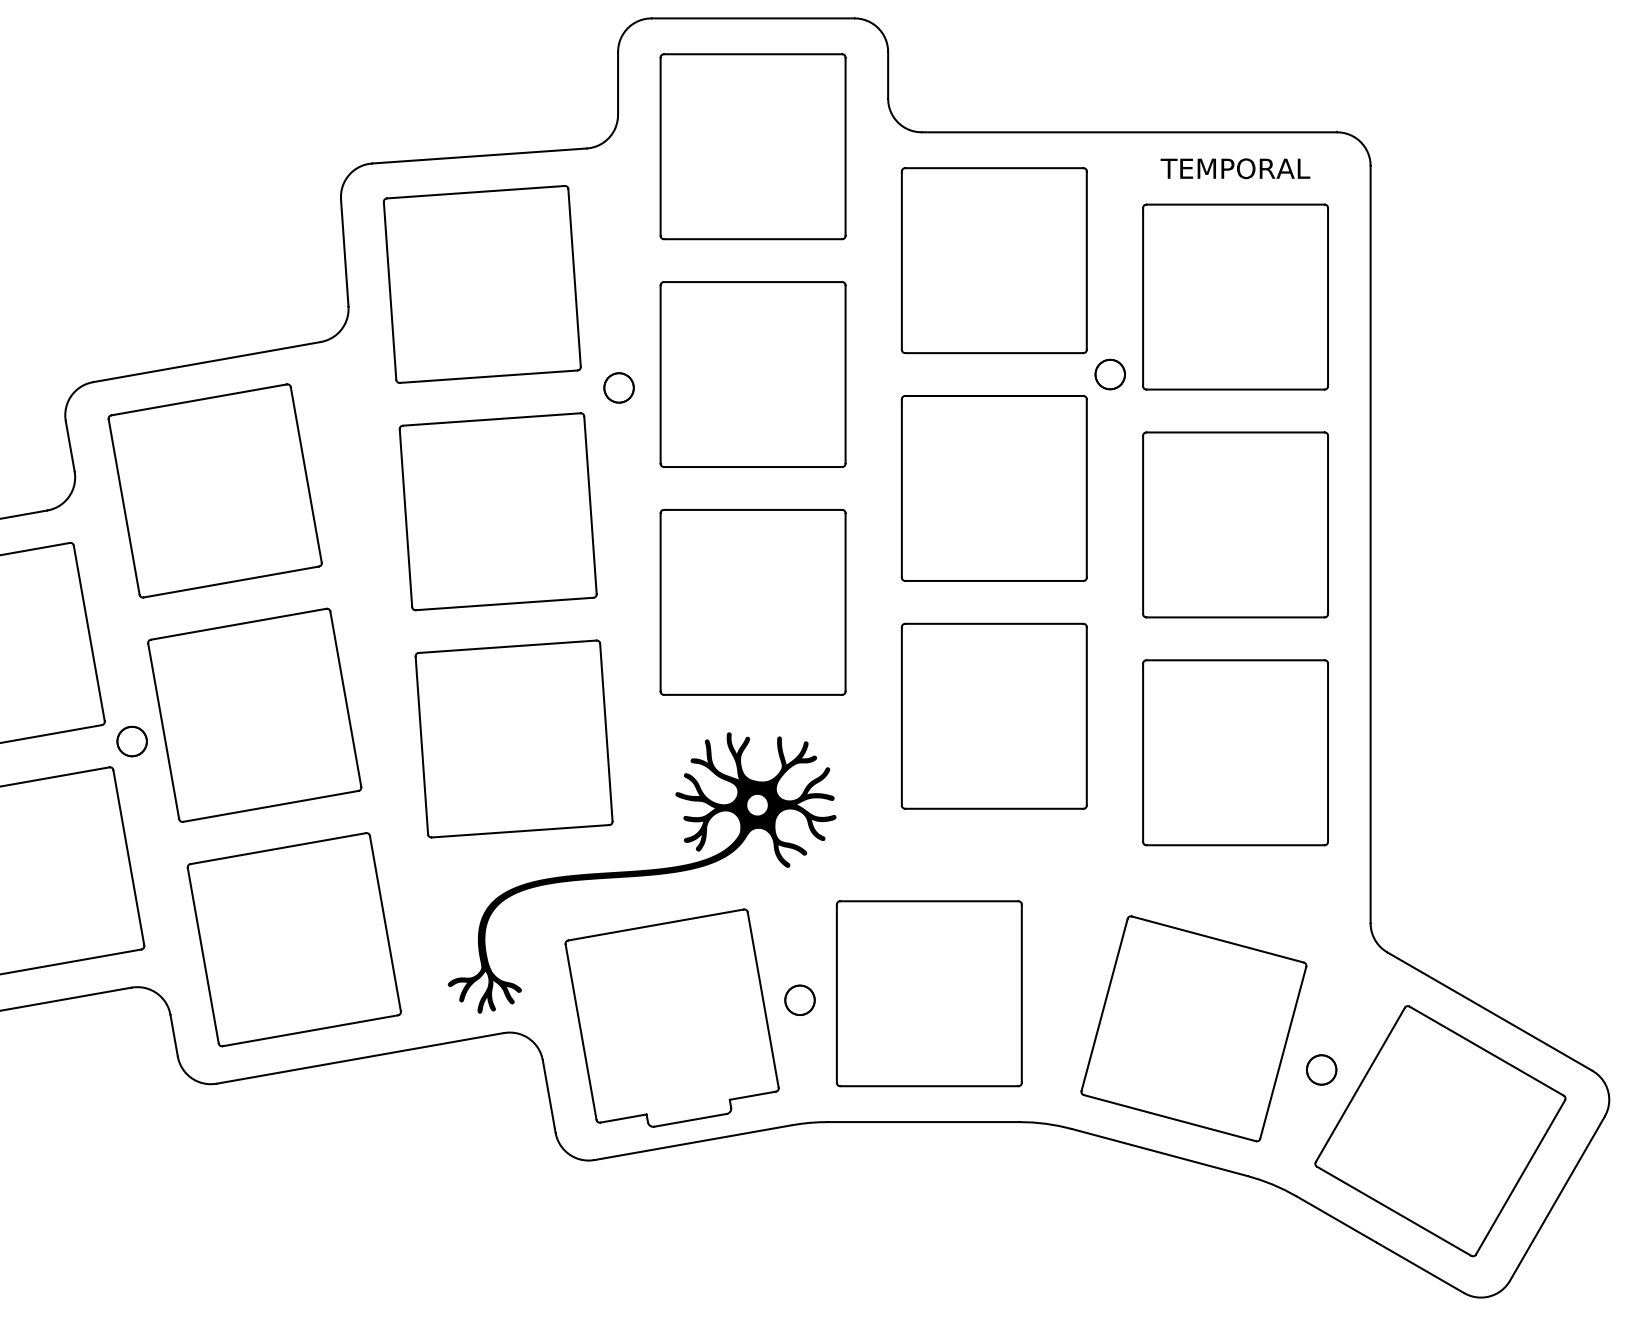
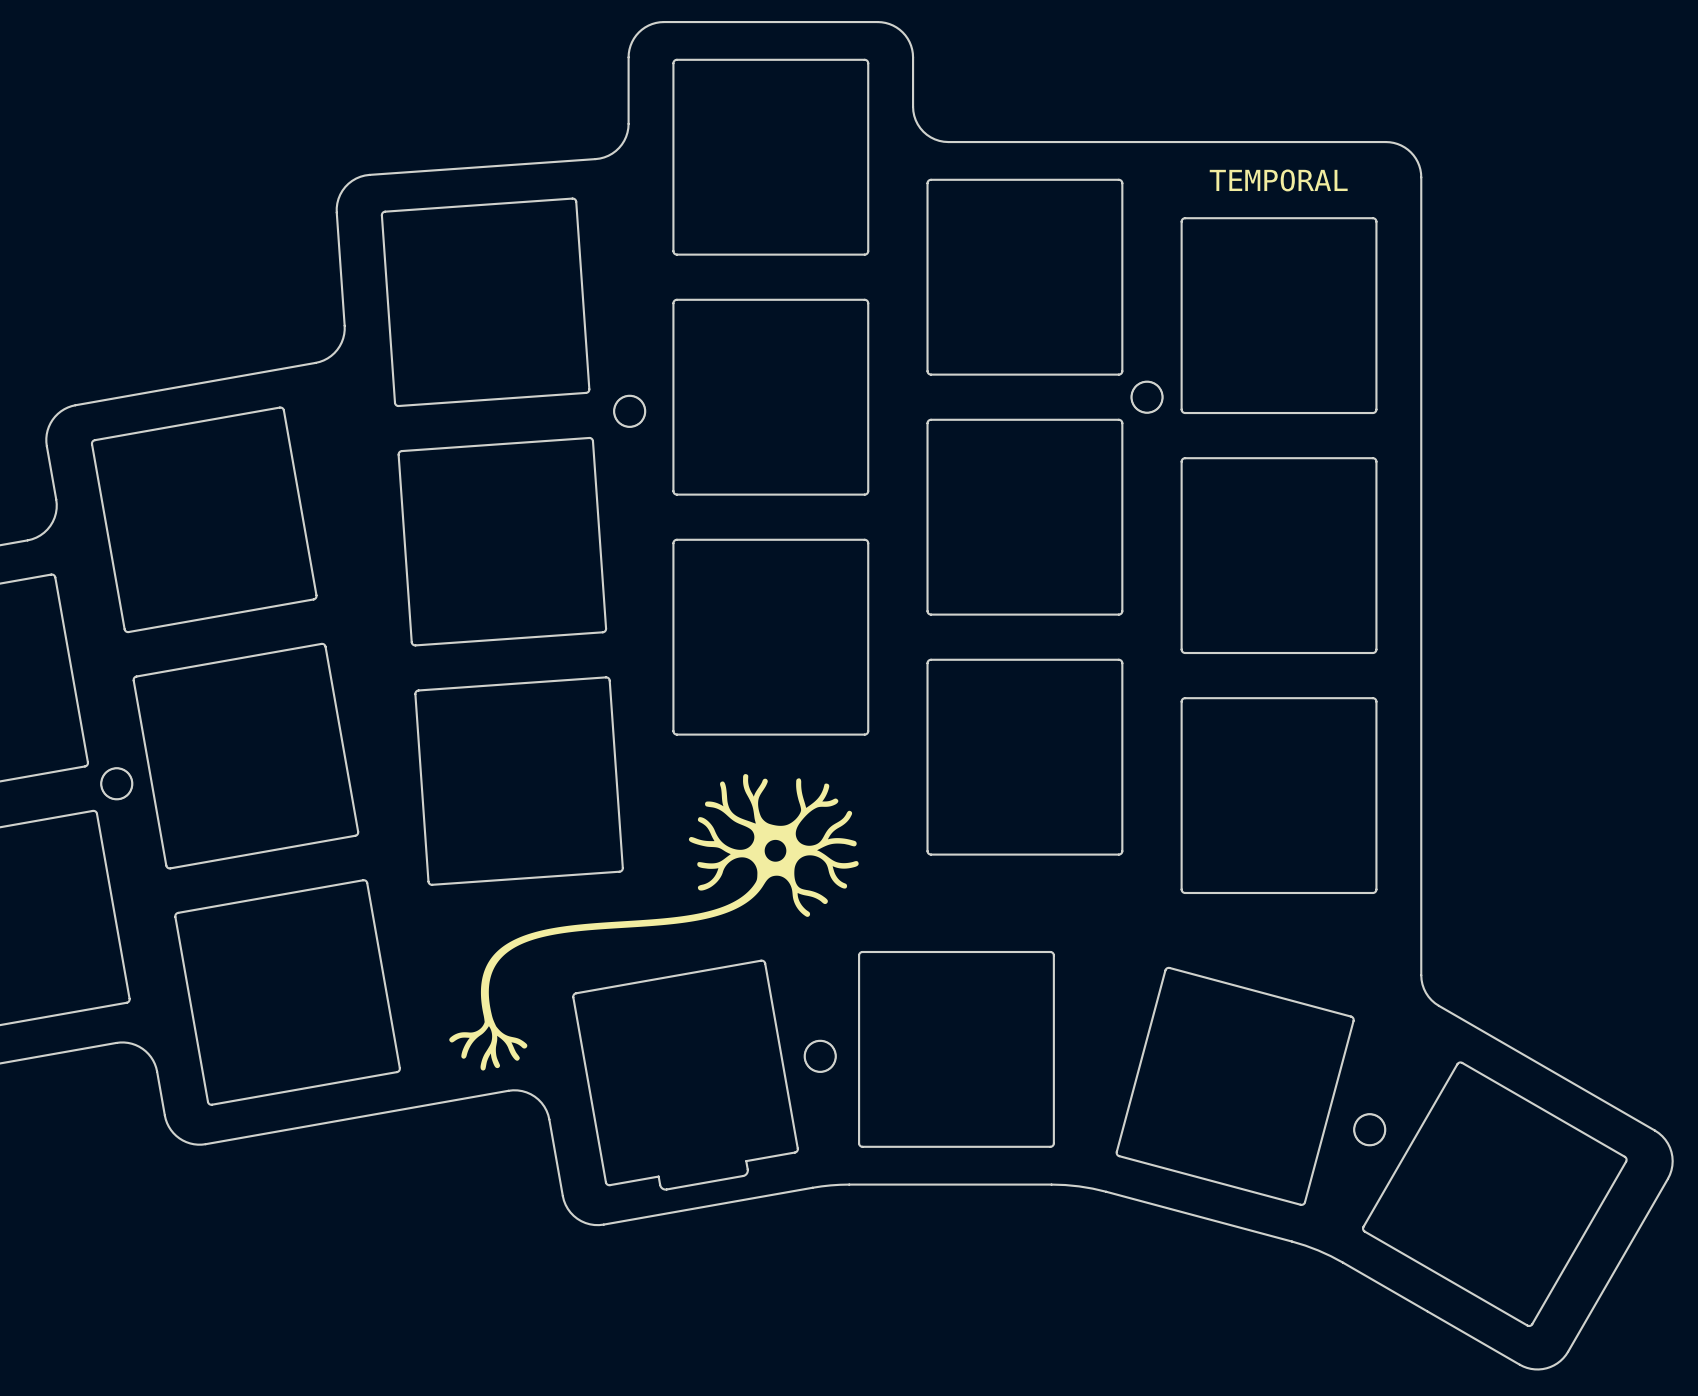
drawing shape: [447, 732, 837, 1014] -> [449, 774, 859, 1071]

